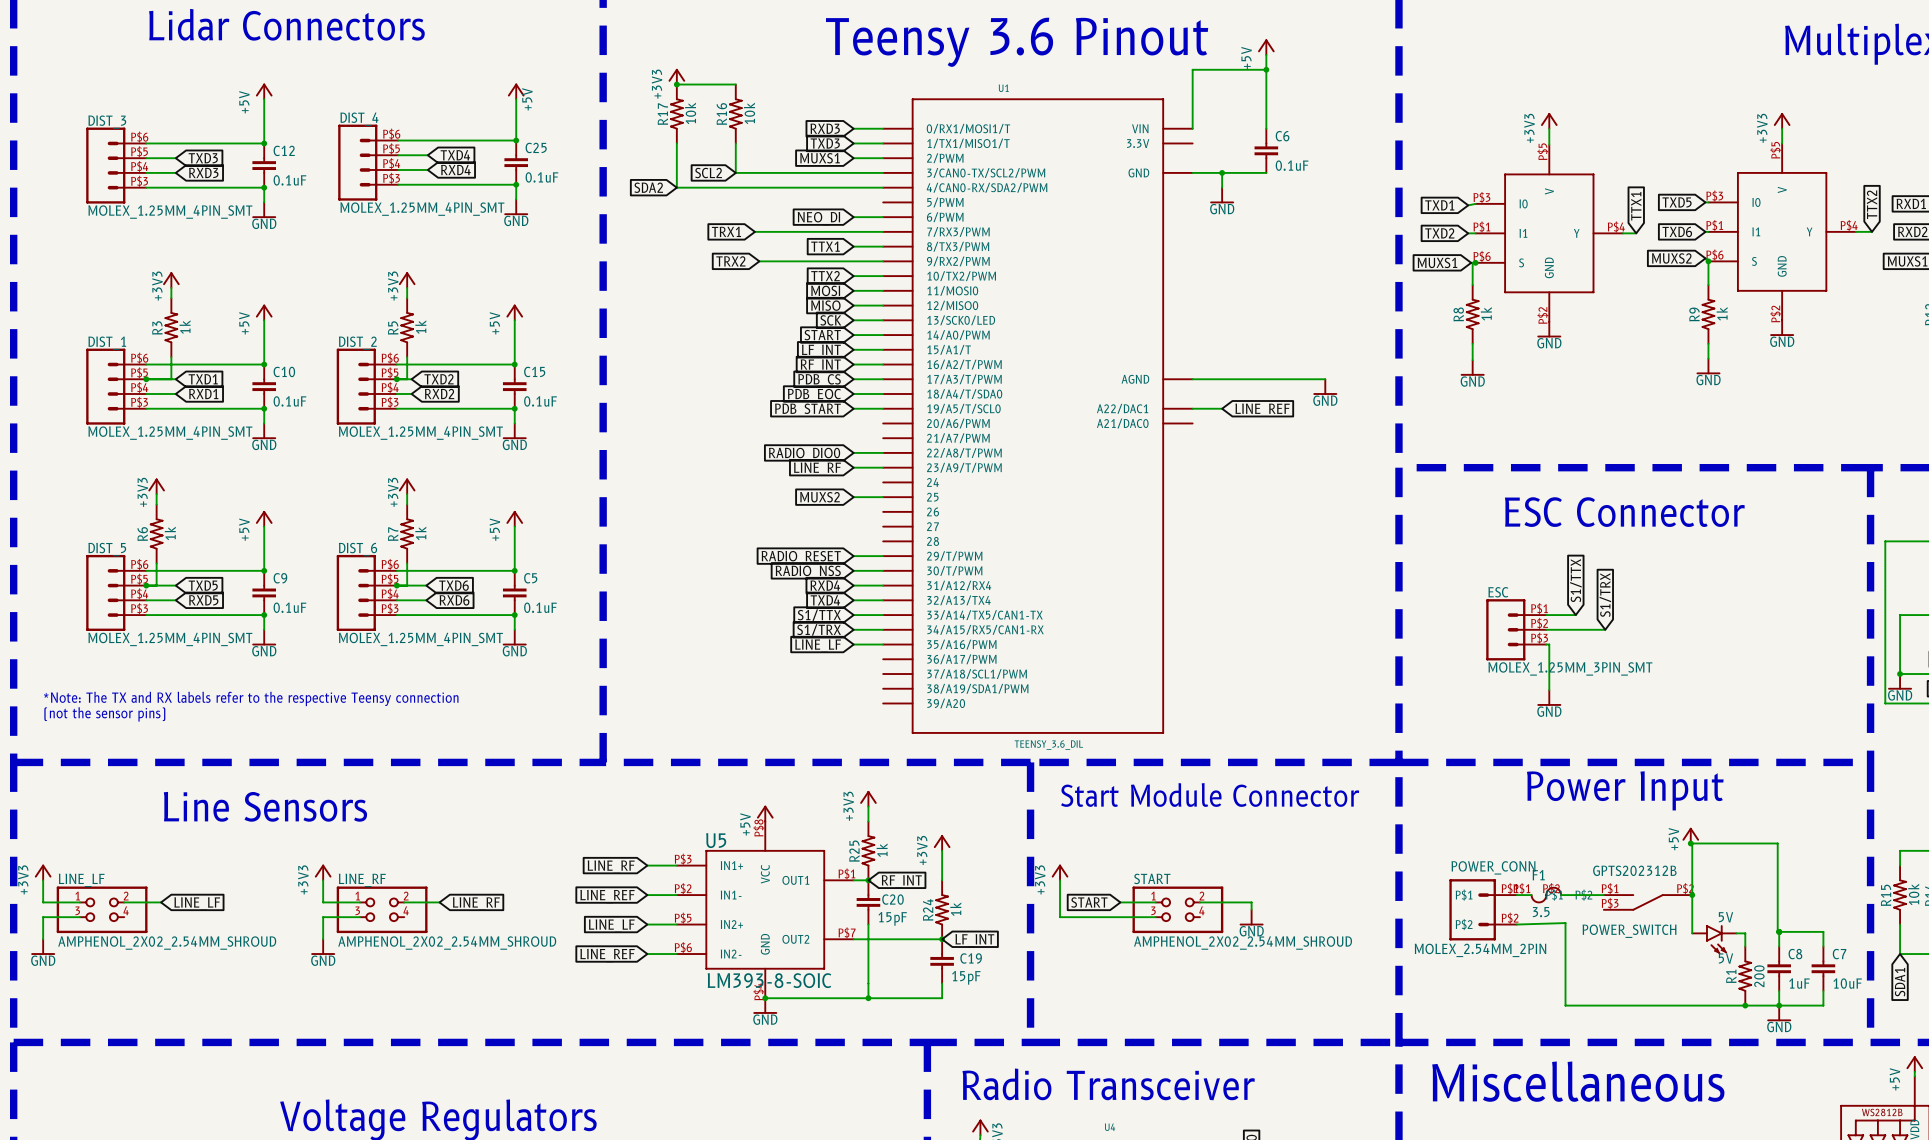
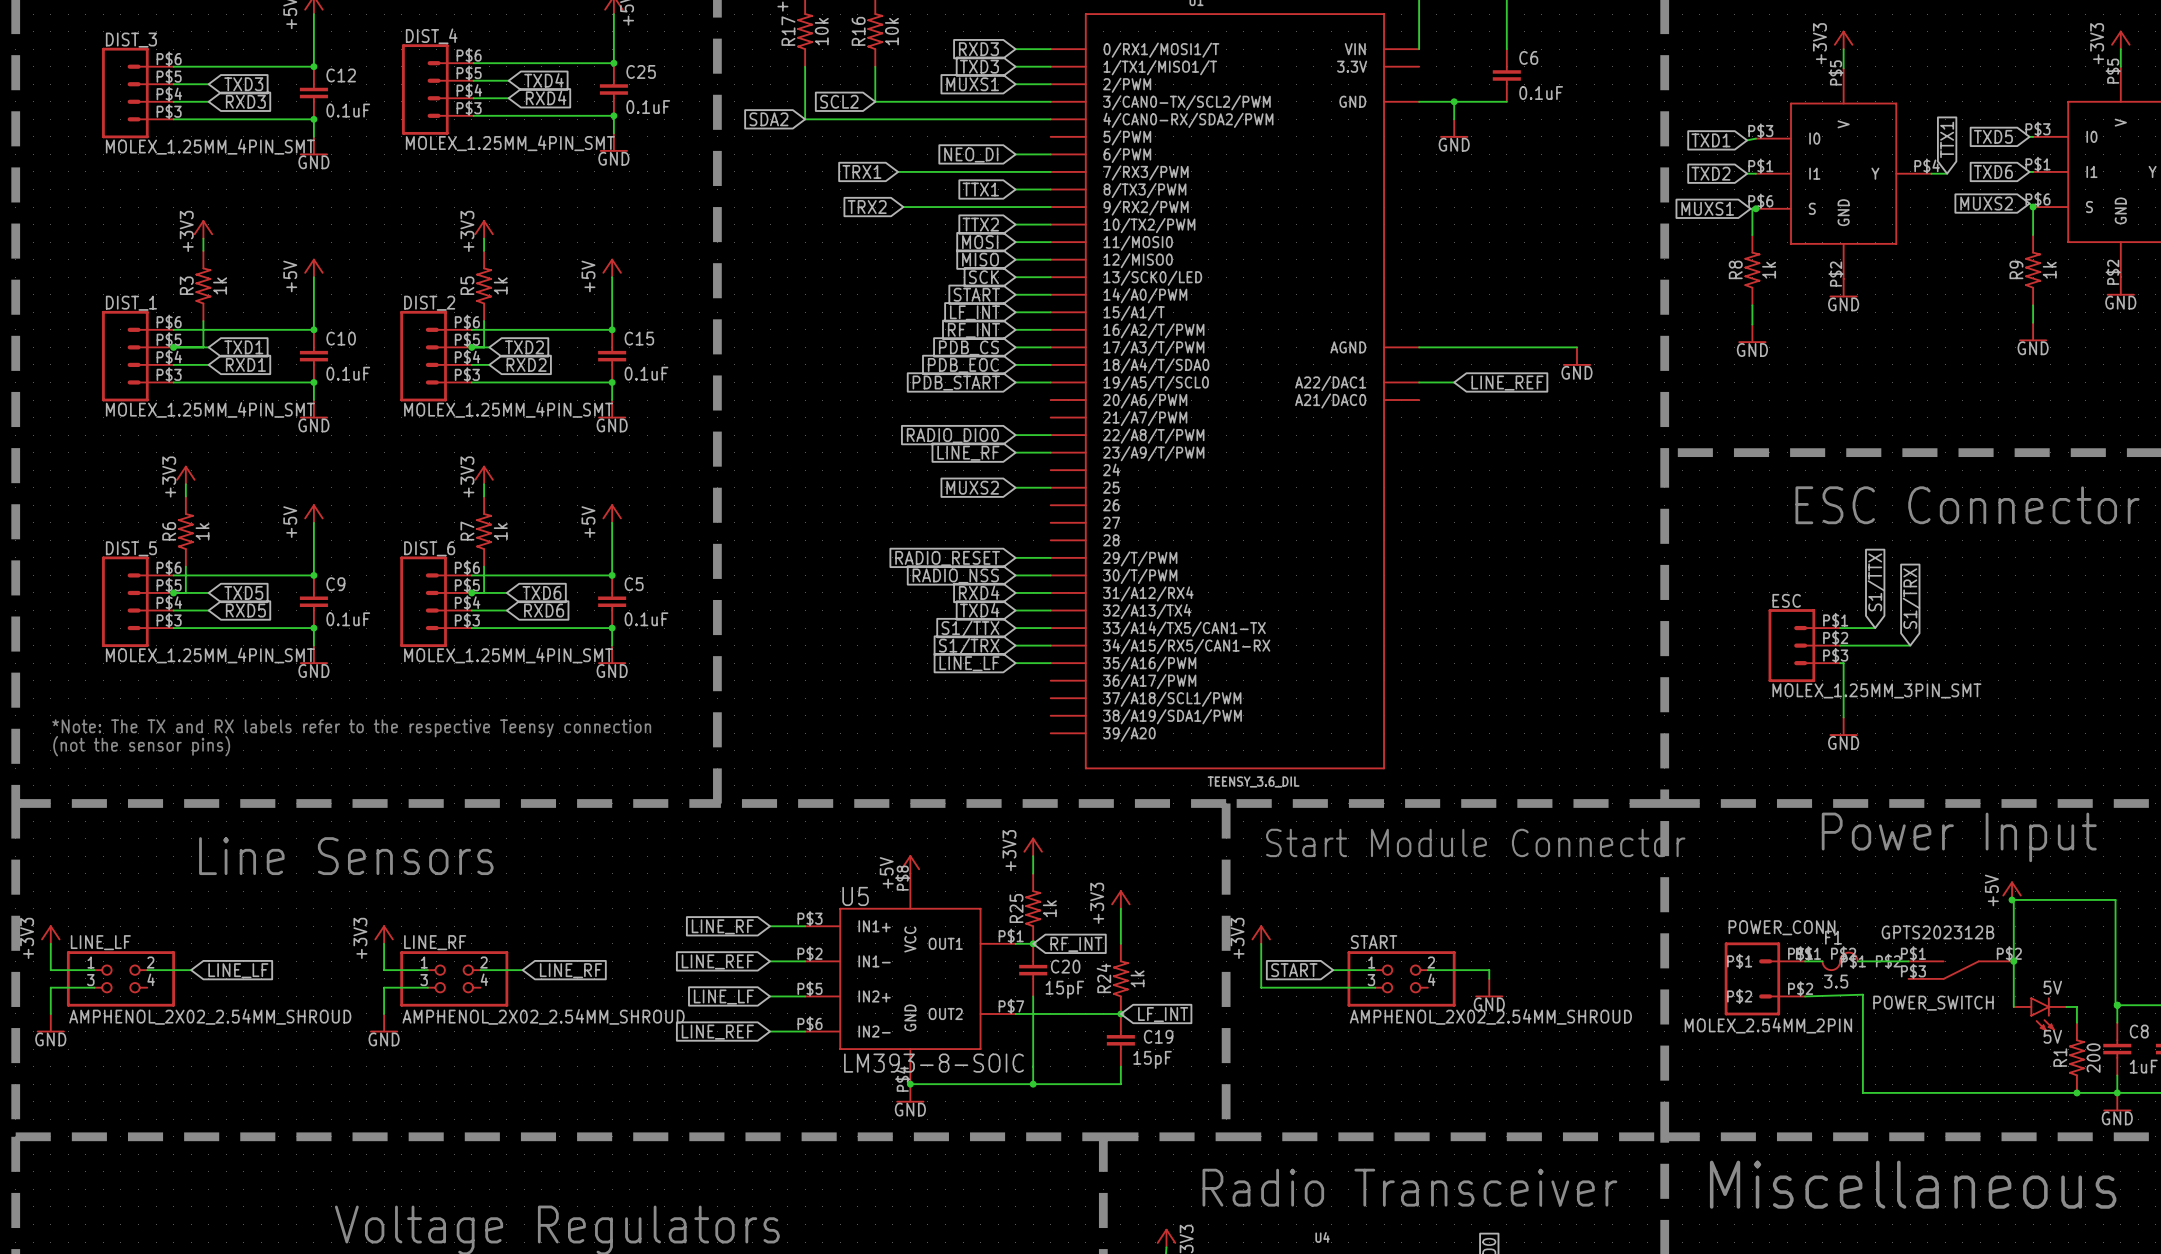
text position: Radio Transceiver (1108, 1084) -> Radio Transceiver (1409, 1187)

